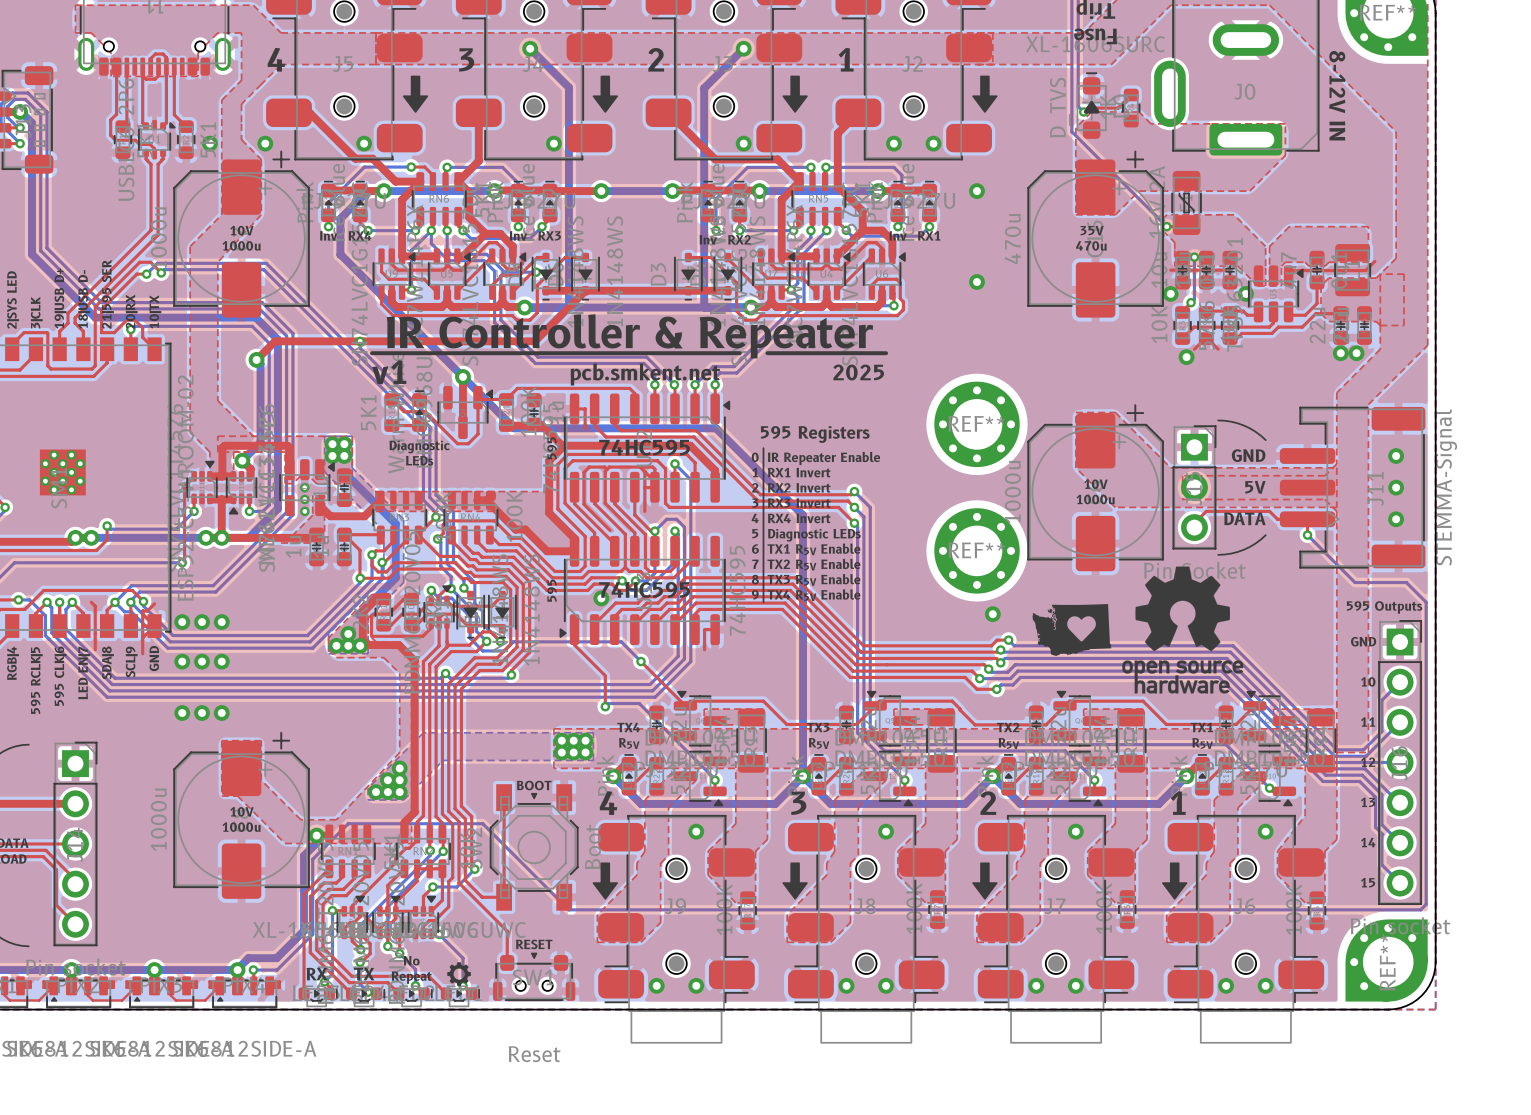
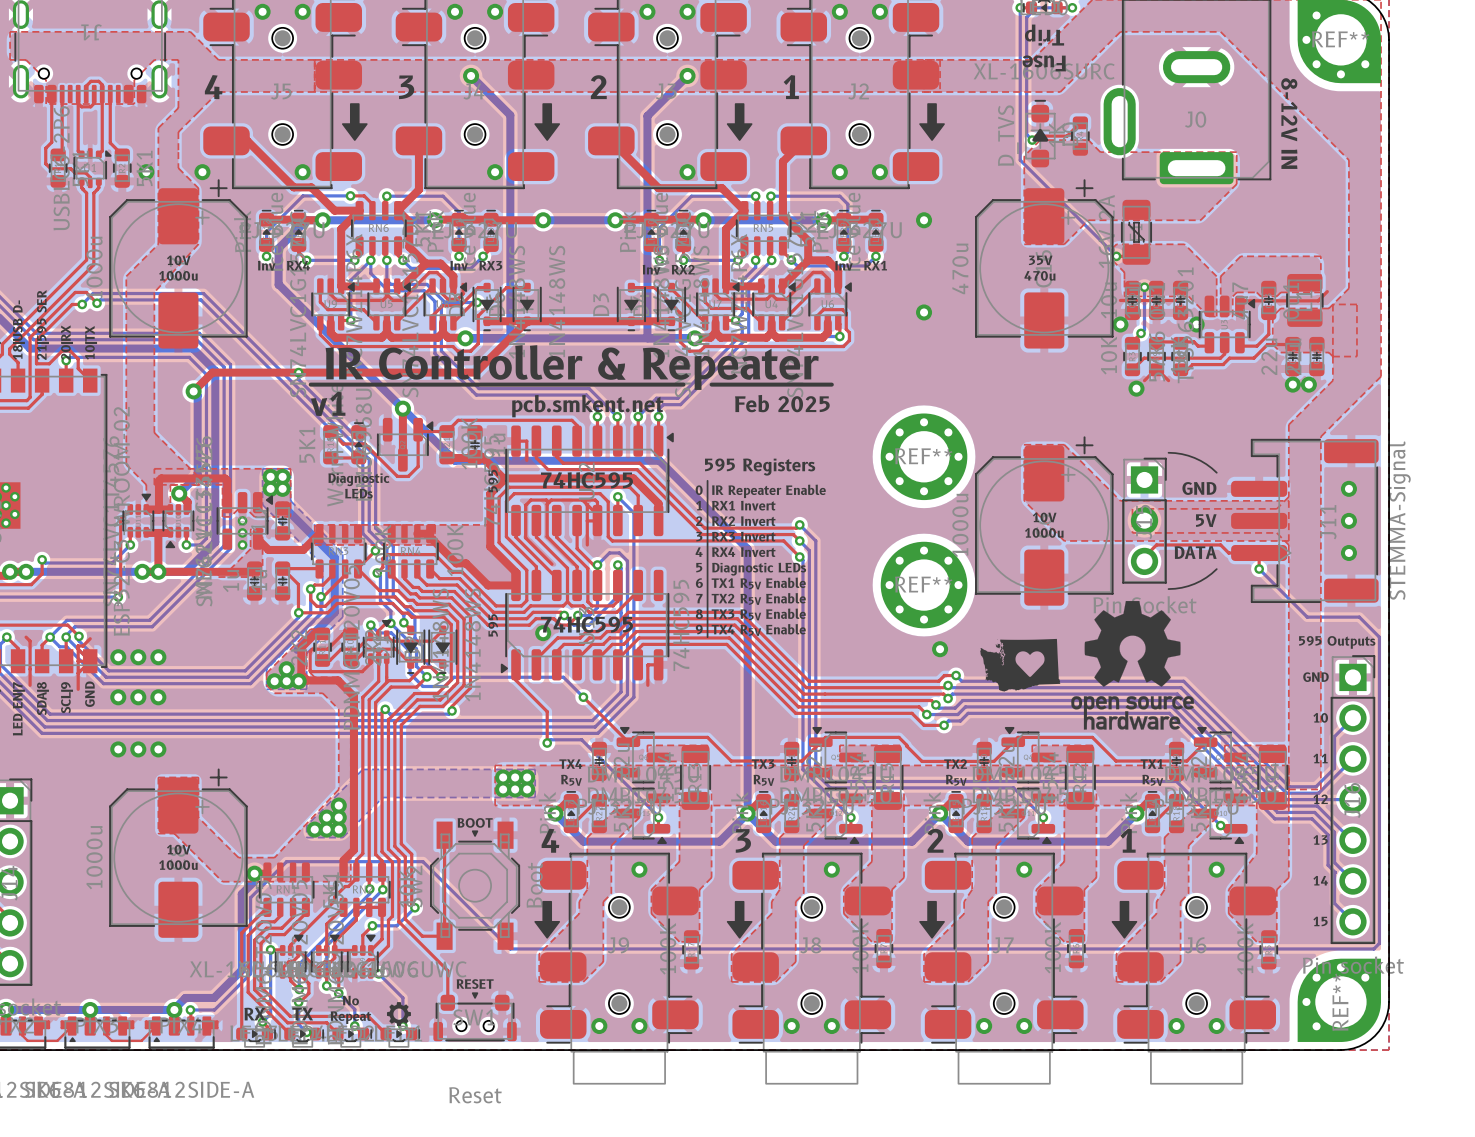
text: 2025 (858, 372) -> Feb 2025 (782, 403)

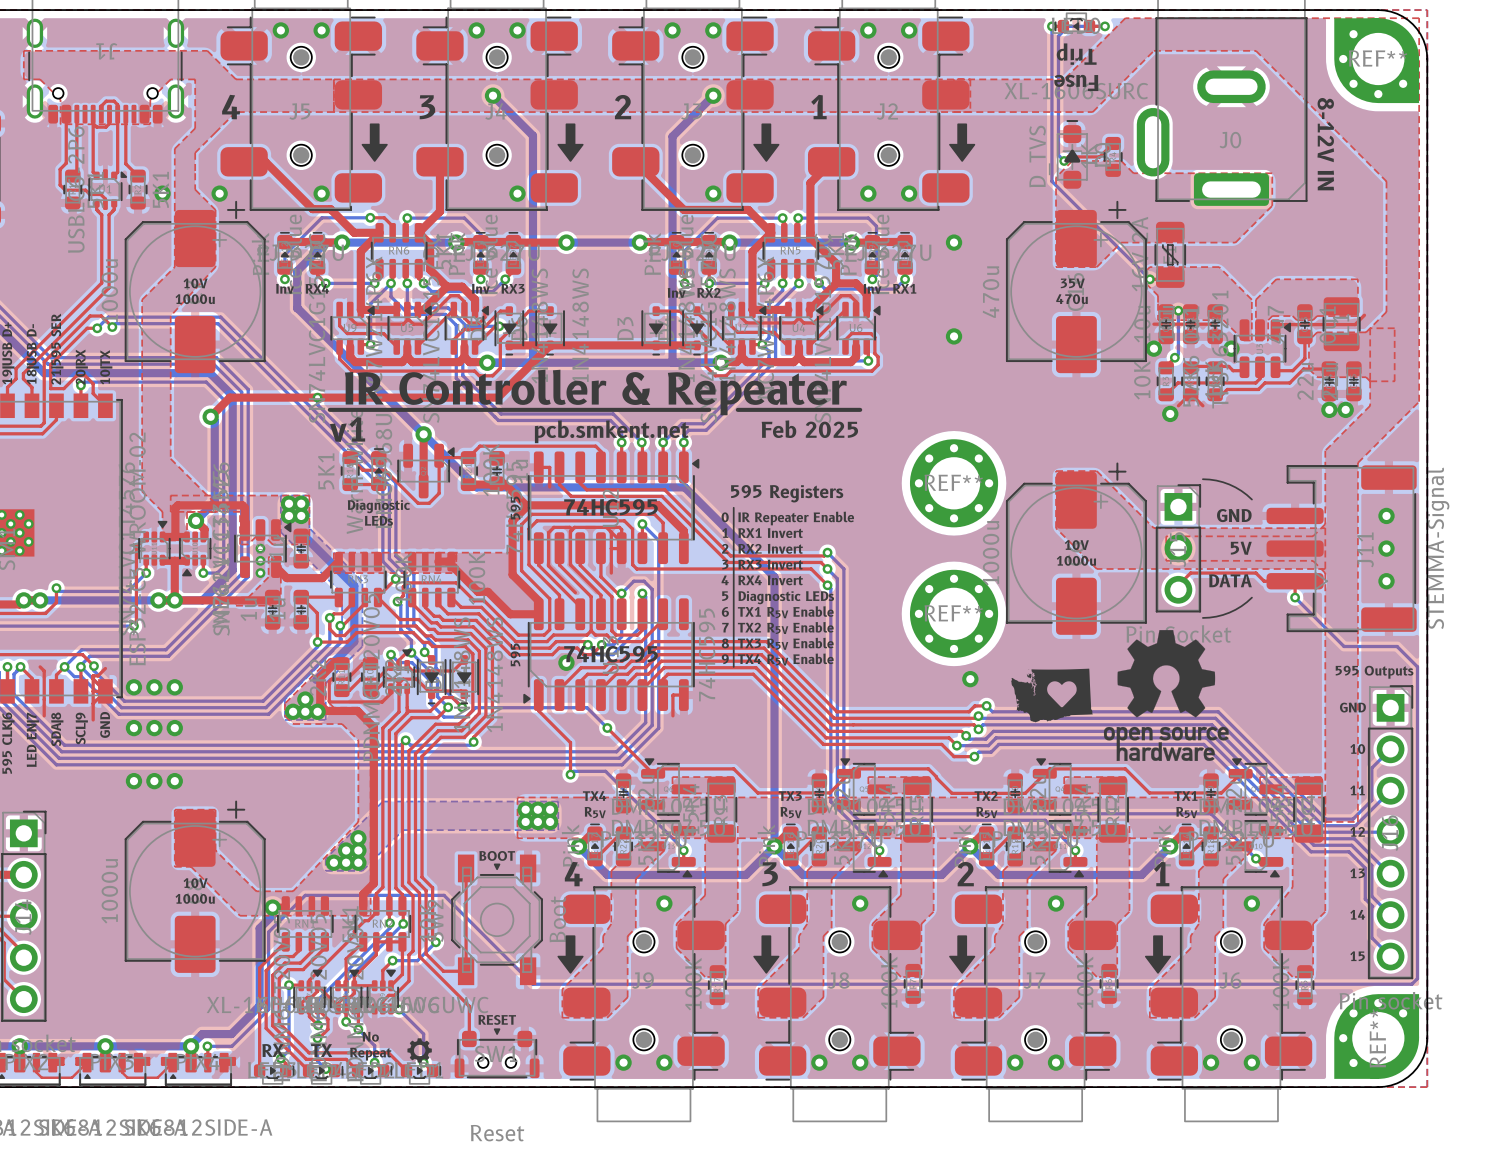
part footprint: [323, 425, 339, 465] -> [340, 451, 360, 492]
part footprint: [439, 425, 455, 465] -> [459, 451, 479, 492]
part footprint: [591, 793, 607, 834] -> [614, 826, 634, 867]
part footprint: [784, 793, 800, 834] -> [809, 826, 829, 867]
part footprint: [976, 793, 992, 834] -> [1005, 826, 1025, 867]
part footprint: [1168, 793, 1185, 834] -> [1201, 826, 1221, 867]

